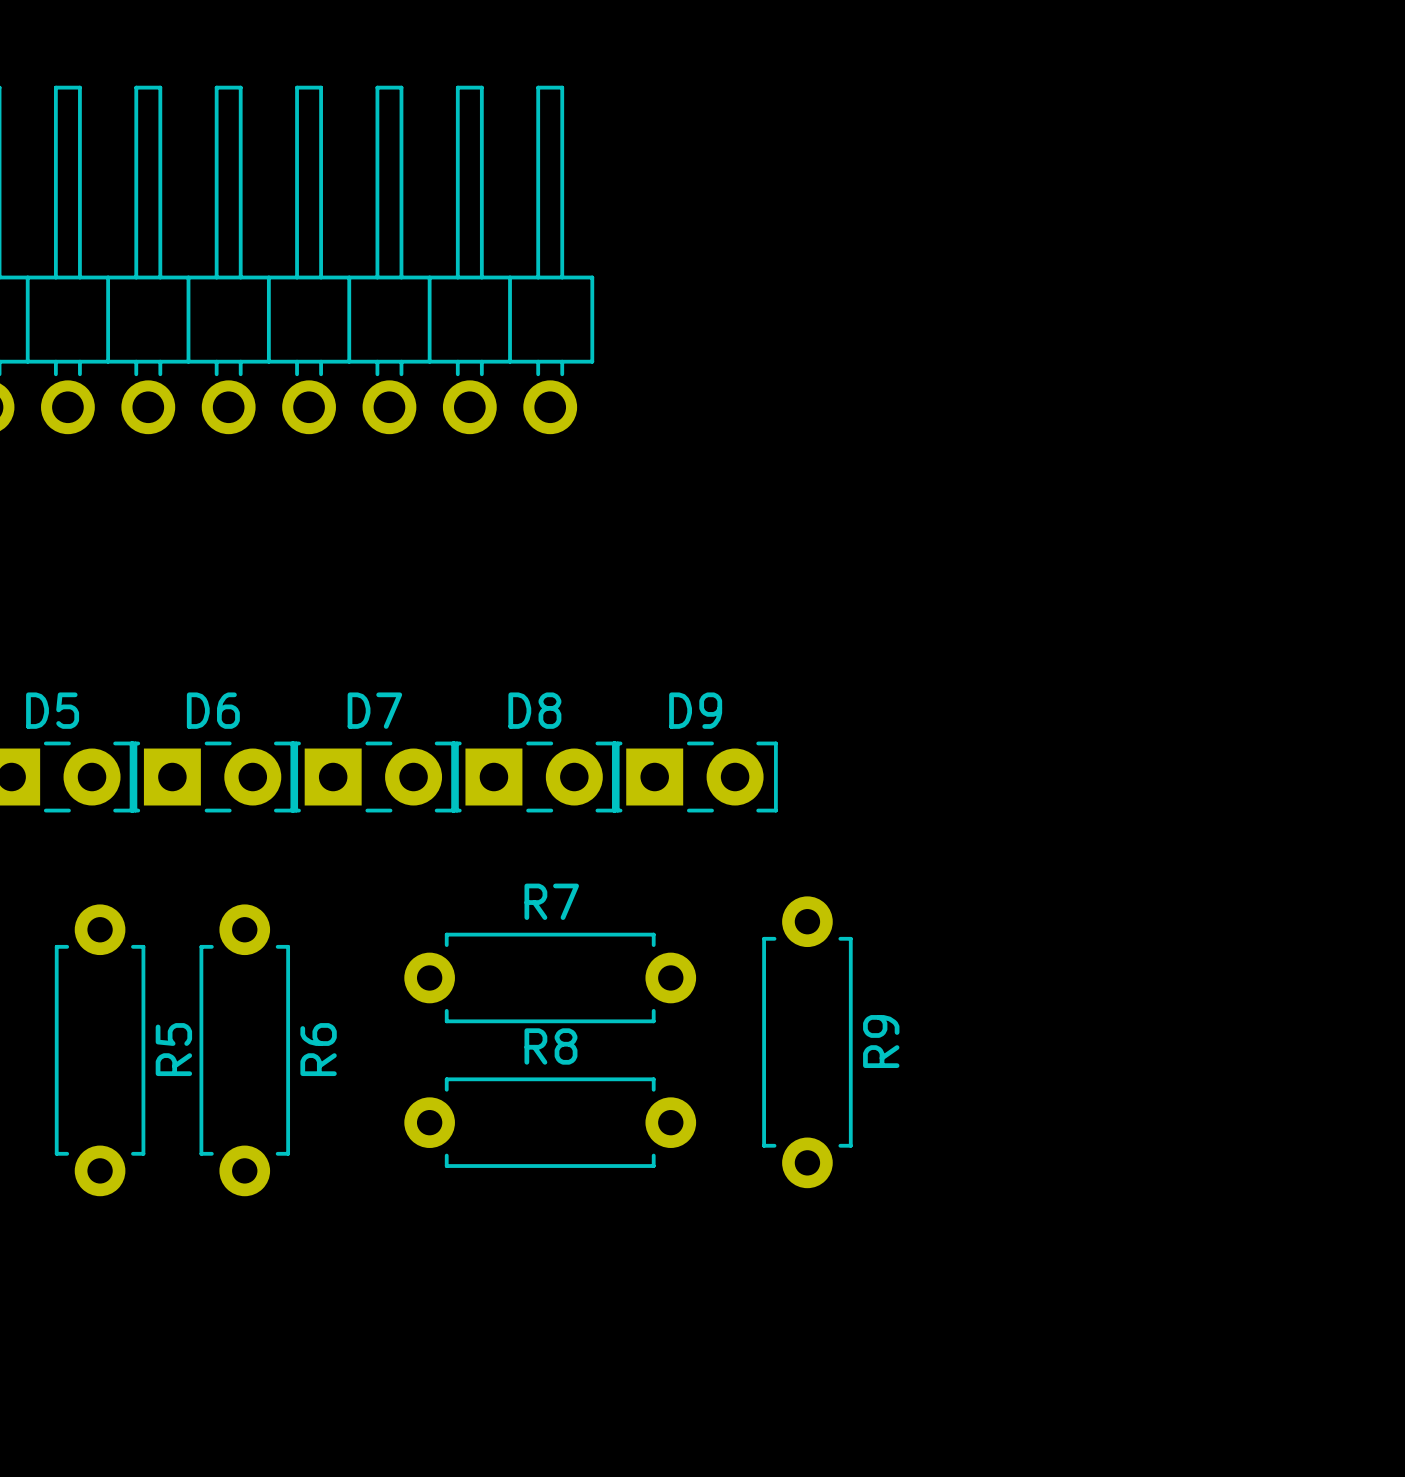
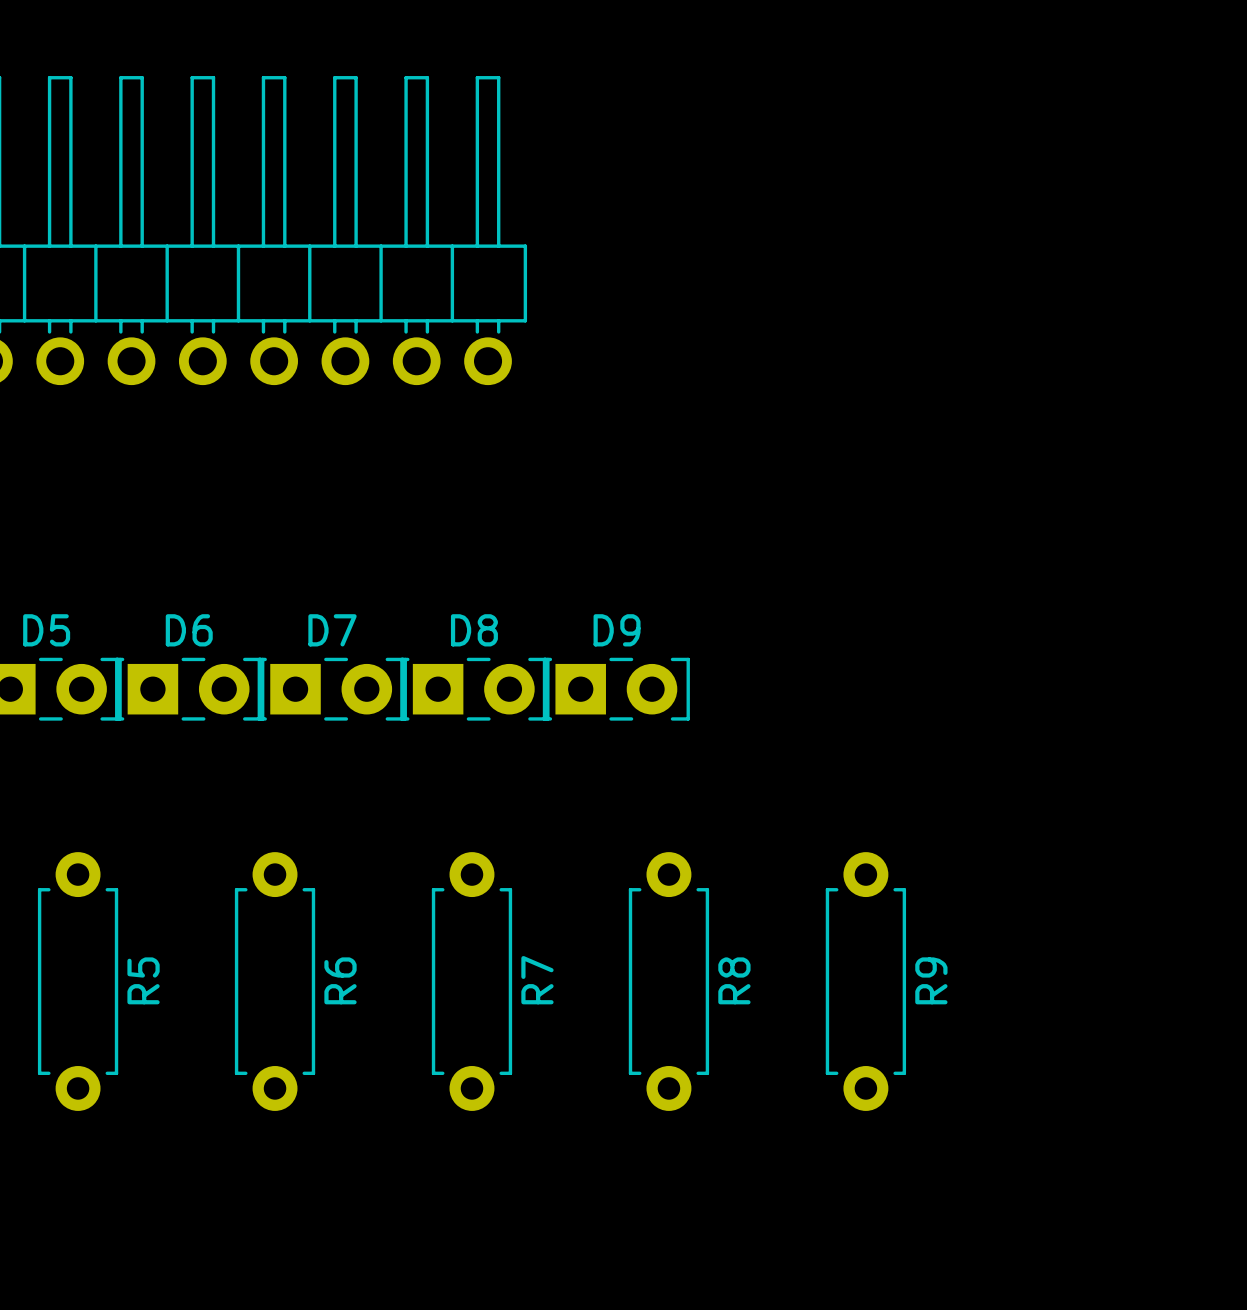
R7 rotation: 0° (550, 977) -> 90° clockwise (471, 981)
R9 position: (807, 1042) -> (865, 981)
R5 position: (100, 1050) -> (78, 981)
R6 position: (244, 1050) -> (275, 981)
R8 rotation: 0° (550, 1122) -> 90° clockwise (668, 981)
R8 position: (550, 1122) -> (668, 981)

